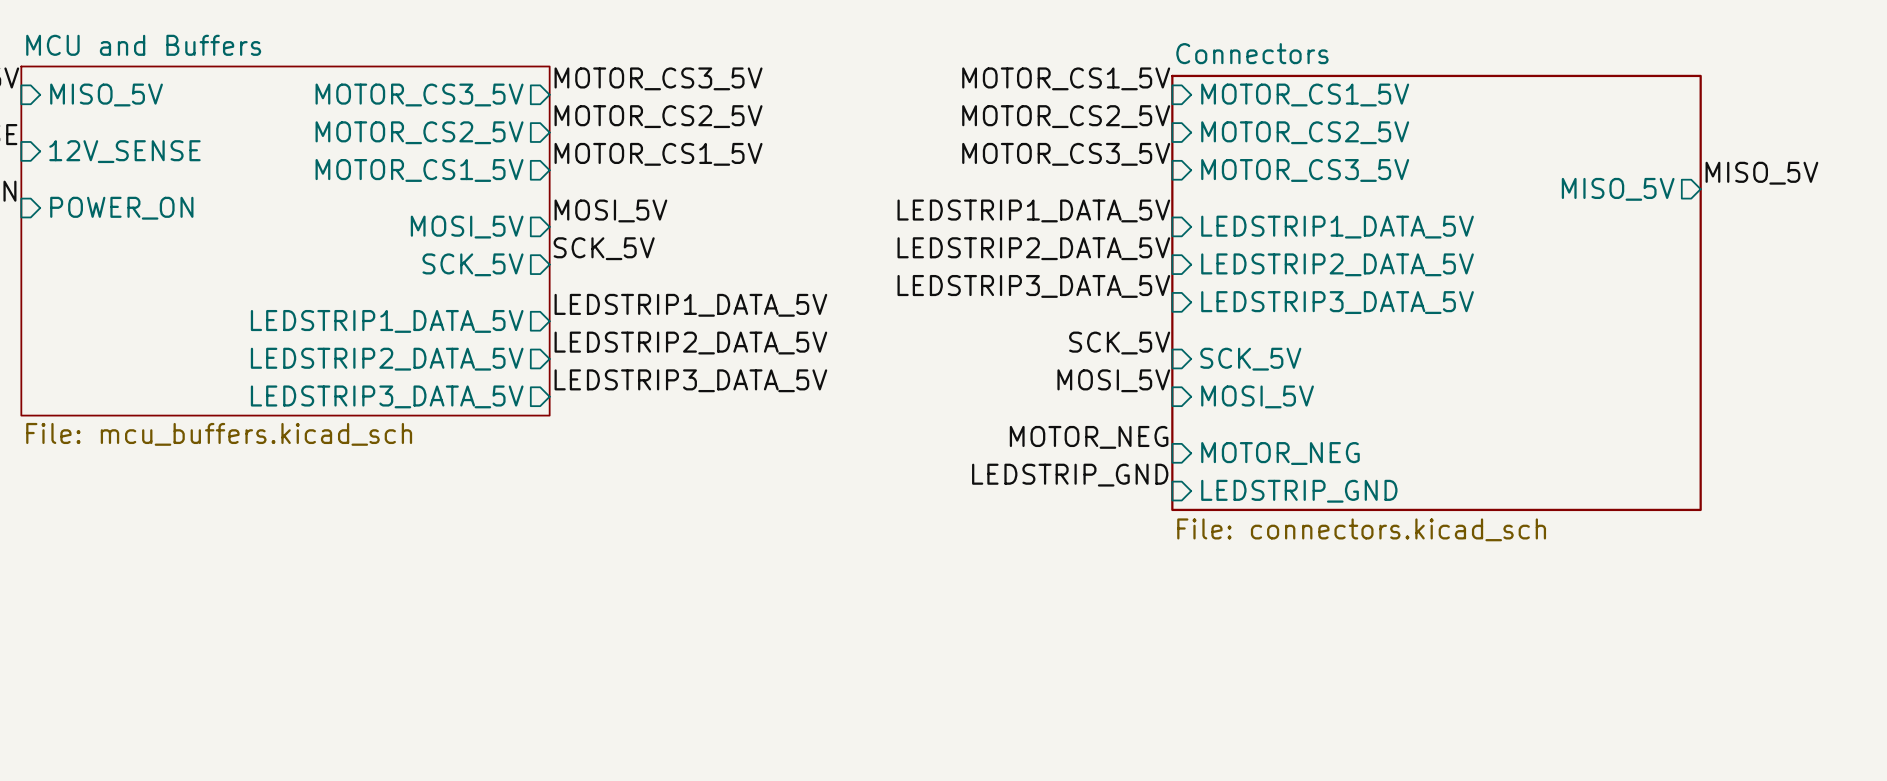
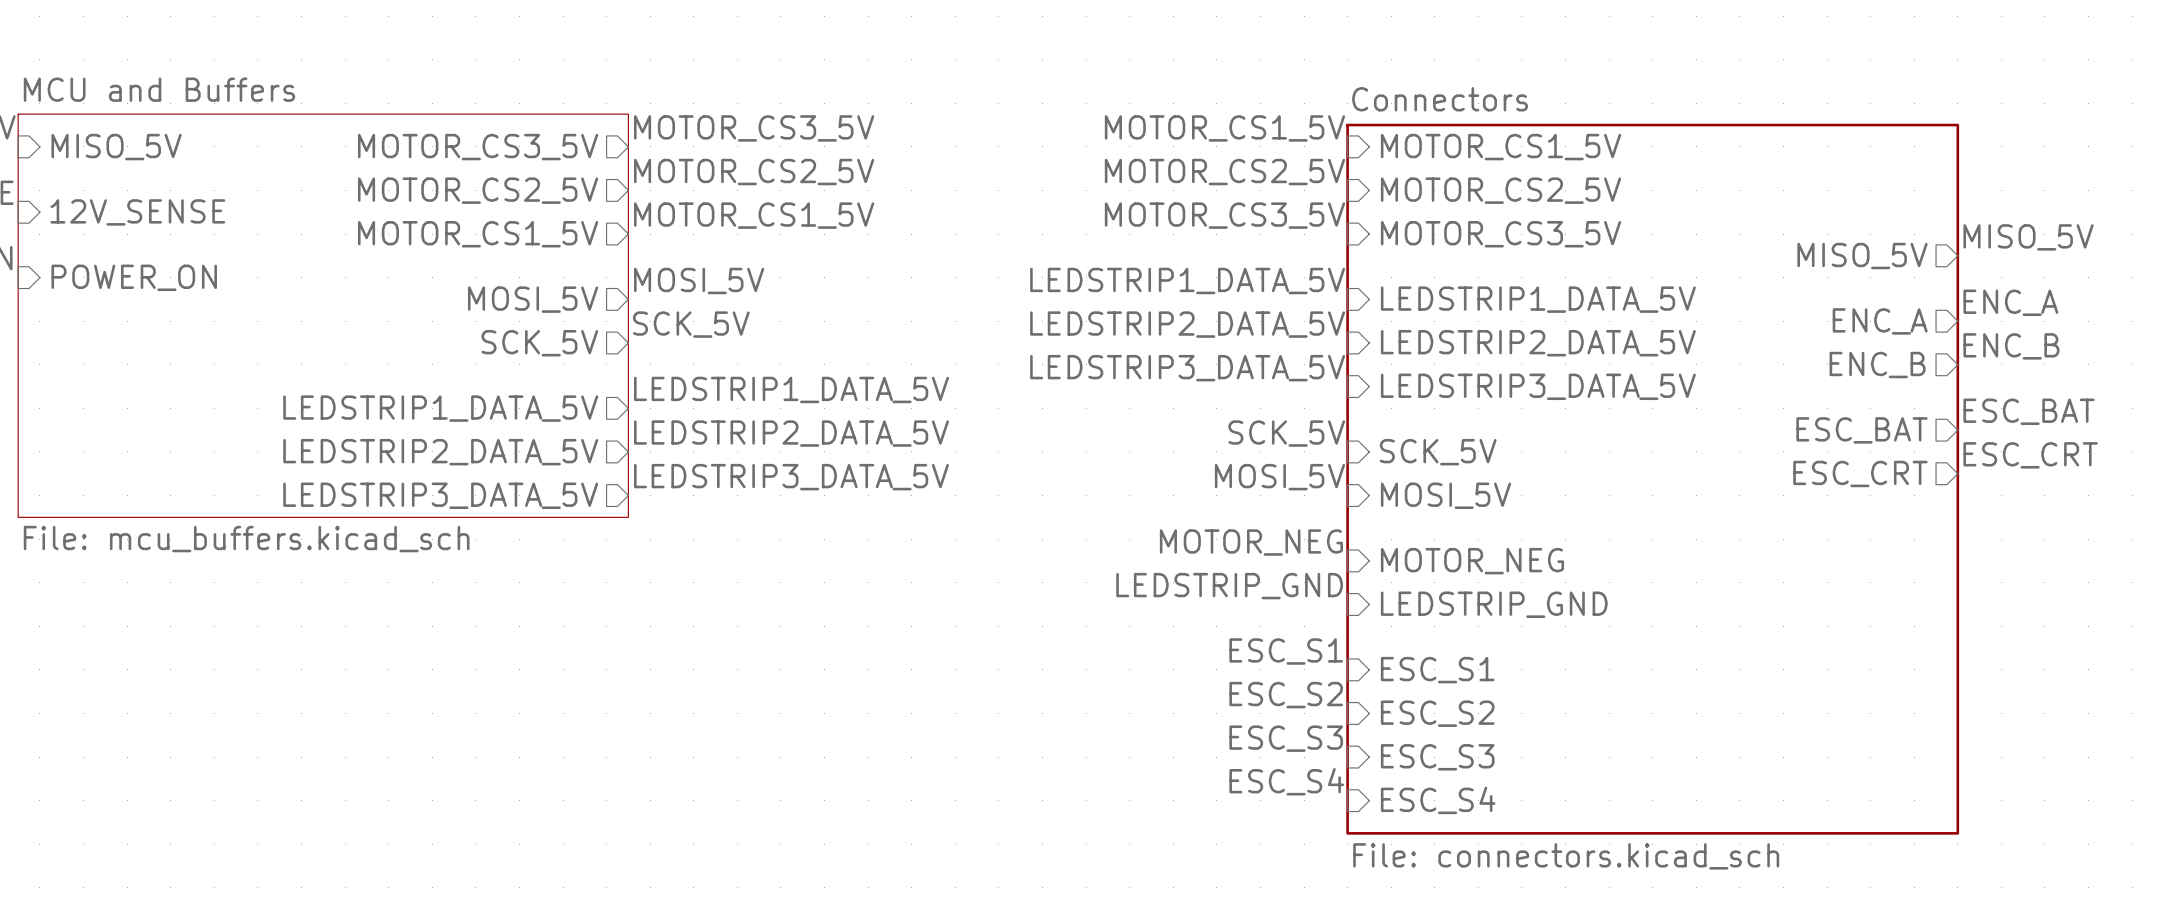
label: none -> ENC_A (2010, 302)
sheet pin: none -> ENC_A (1880, 321)
label: none -> ENC_B (2011, 346)
sheet pin: none -> ENC_B (1877, 365)
sheet Connectors: File: connectors.kicad_sch (1436, 292) -> none
label: none -> ESC_BAT (2029, 411)
sheet pin: none -> ESC_BAT (1862, 430)
label: none -> ESC_CRT (2030, 455)
sheet pin: none -> ESC_CRT (1860, 473)
sheet Connectors: none -> File: connectors.kicad_sch (1652, 479)
label: none -> ESC_S1 (1286, 651)
sheet pin: none -> ESC_S1 (1437, 670)
label: none -> ESC_S2 (1286, 695)
sheet pin: none -> ESC_S2 (1437, 713)
label: none -> ESC_S3 (1286, 738)
sheet pin: none -> ESC_S3 (1437, 757)
label: none -> ESC_S4 (1286, 781)
sheet pin: none -> ESC_S4 (1438, 800)

